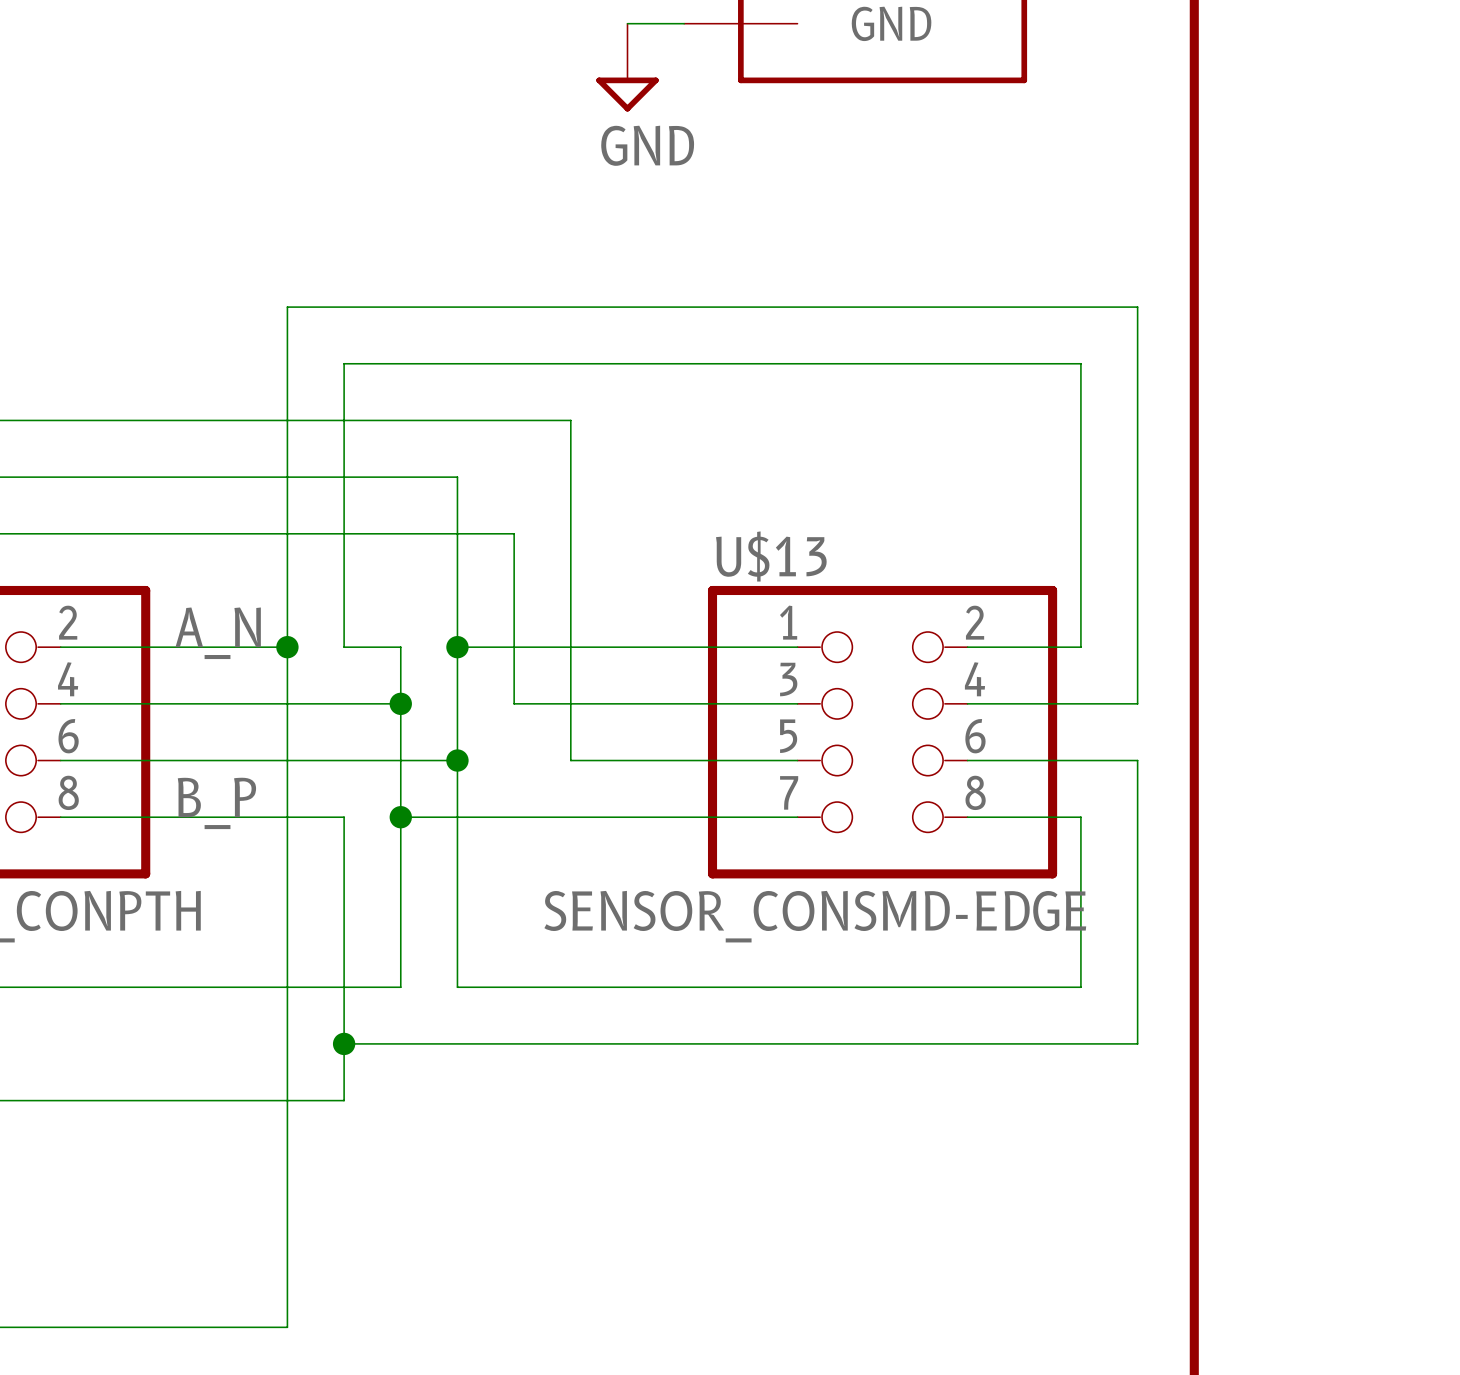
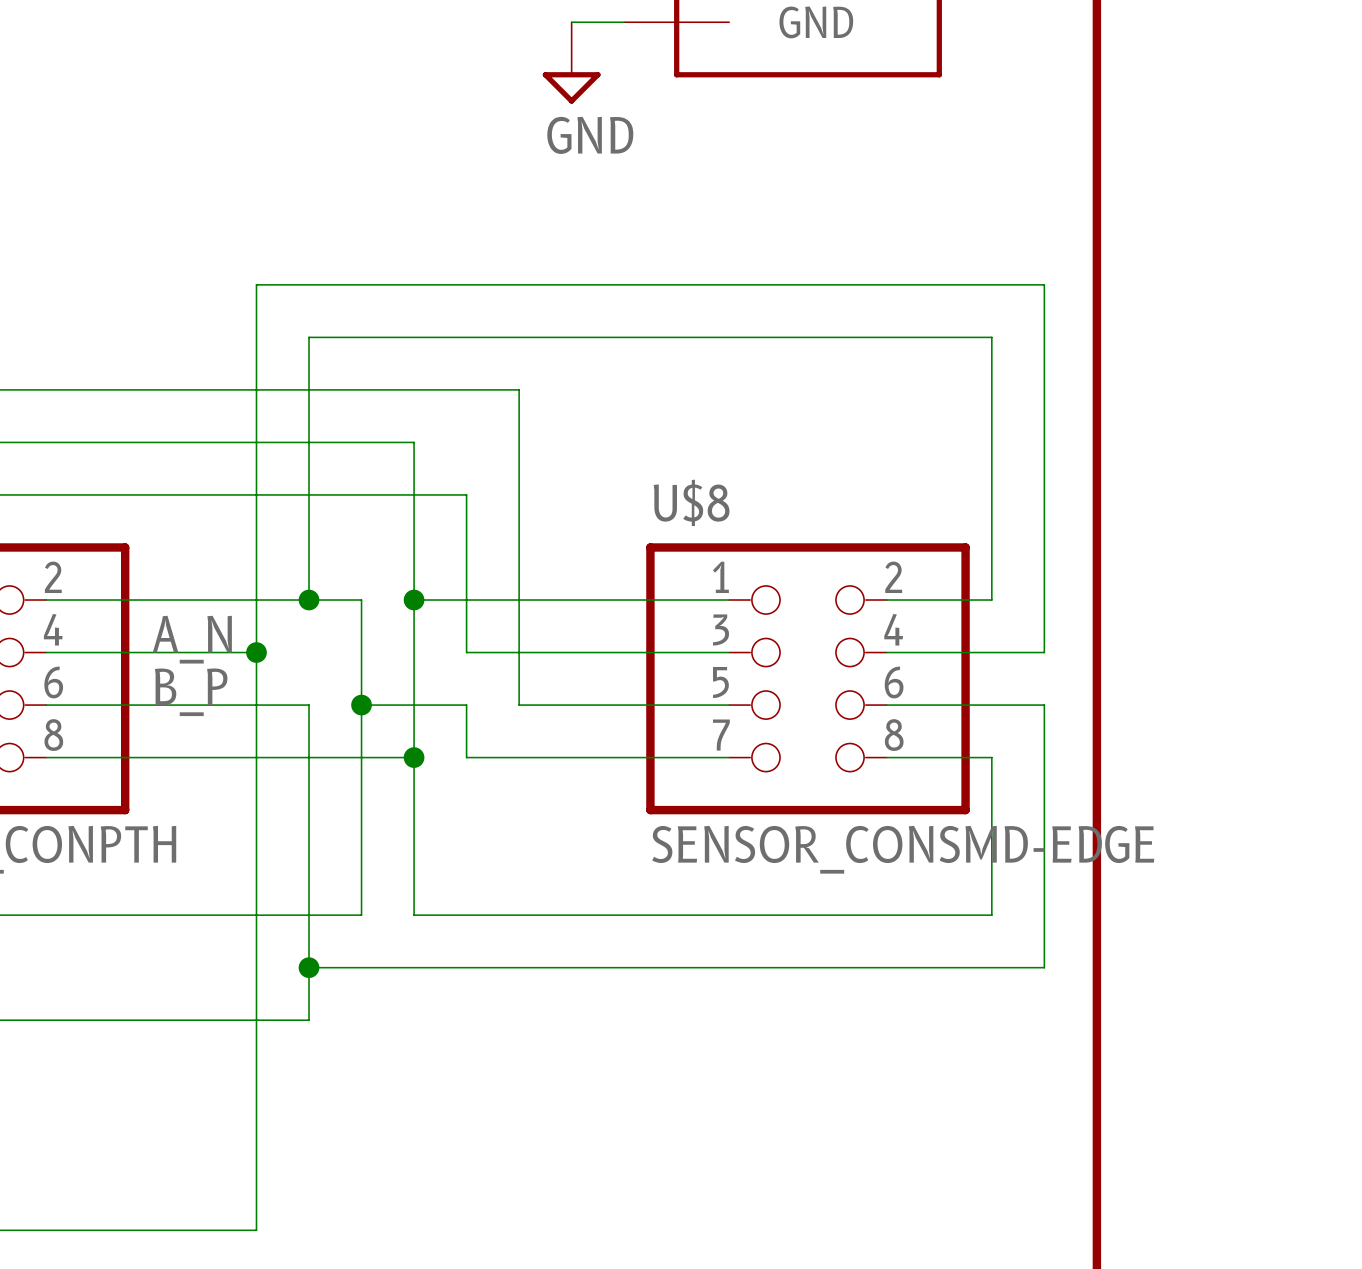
U$13 name: U$13 (771, 556) -> U$8 (691, 502)
label position: A_N (218, 633) -> A_N (192, 639)
wire: none -> (256, 600) (309, 600)
junction: (287, 647) -> none
junction: none -> (309, 600)
wire: (287, 703) (400, 703) -> none
junction: none -> (256, 652)
junction: (400, 703) -> none
wire: (344, 760) (400, 760) -> (309, 705) (309, 757) (361, 757)
junction: none -> (361, 705)
junction: (457, 760) -> none
label position: B_P (216, 803) -> B_P (191, 692)
junction: (400, 817) -> none
wire: (457, 817) (514, 817) -> (414, 705) (466, 705) (466, 757)
junction: none -> (414, 757)
U$13 value position: SENSOR_CONSMD-EDGE (815, 916) -> SENSOR_CONSMD-EDGE (903, 849)

